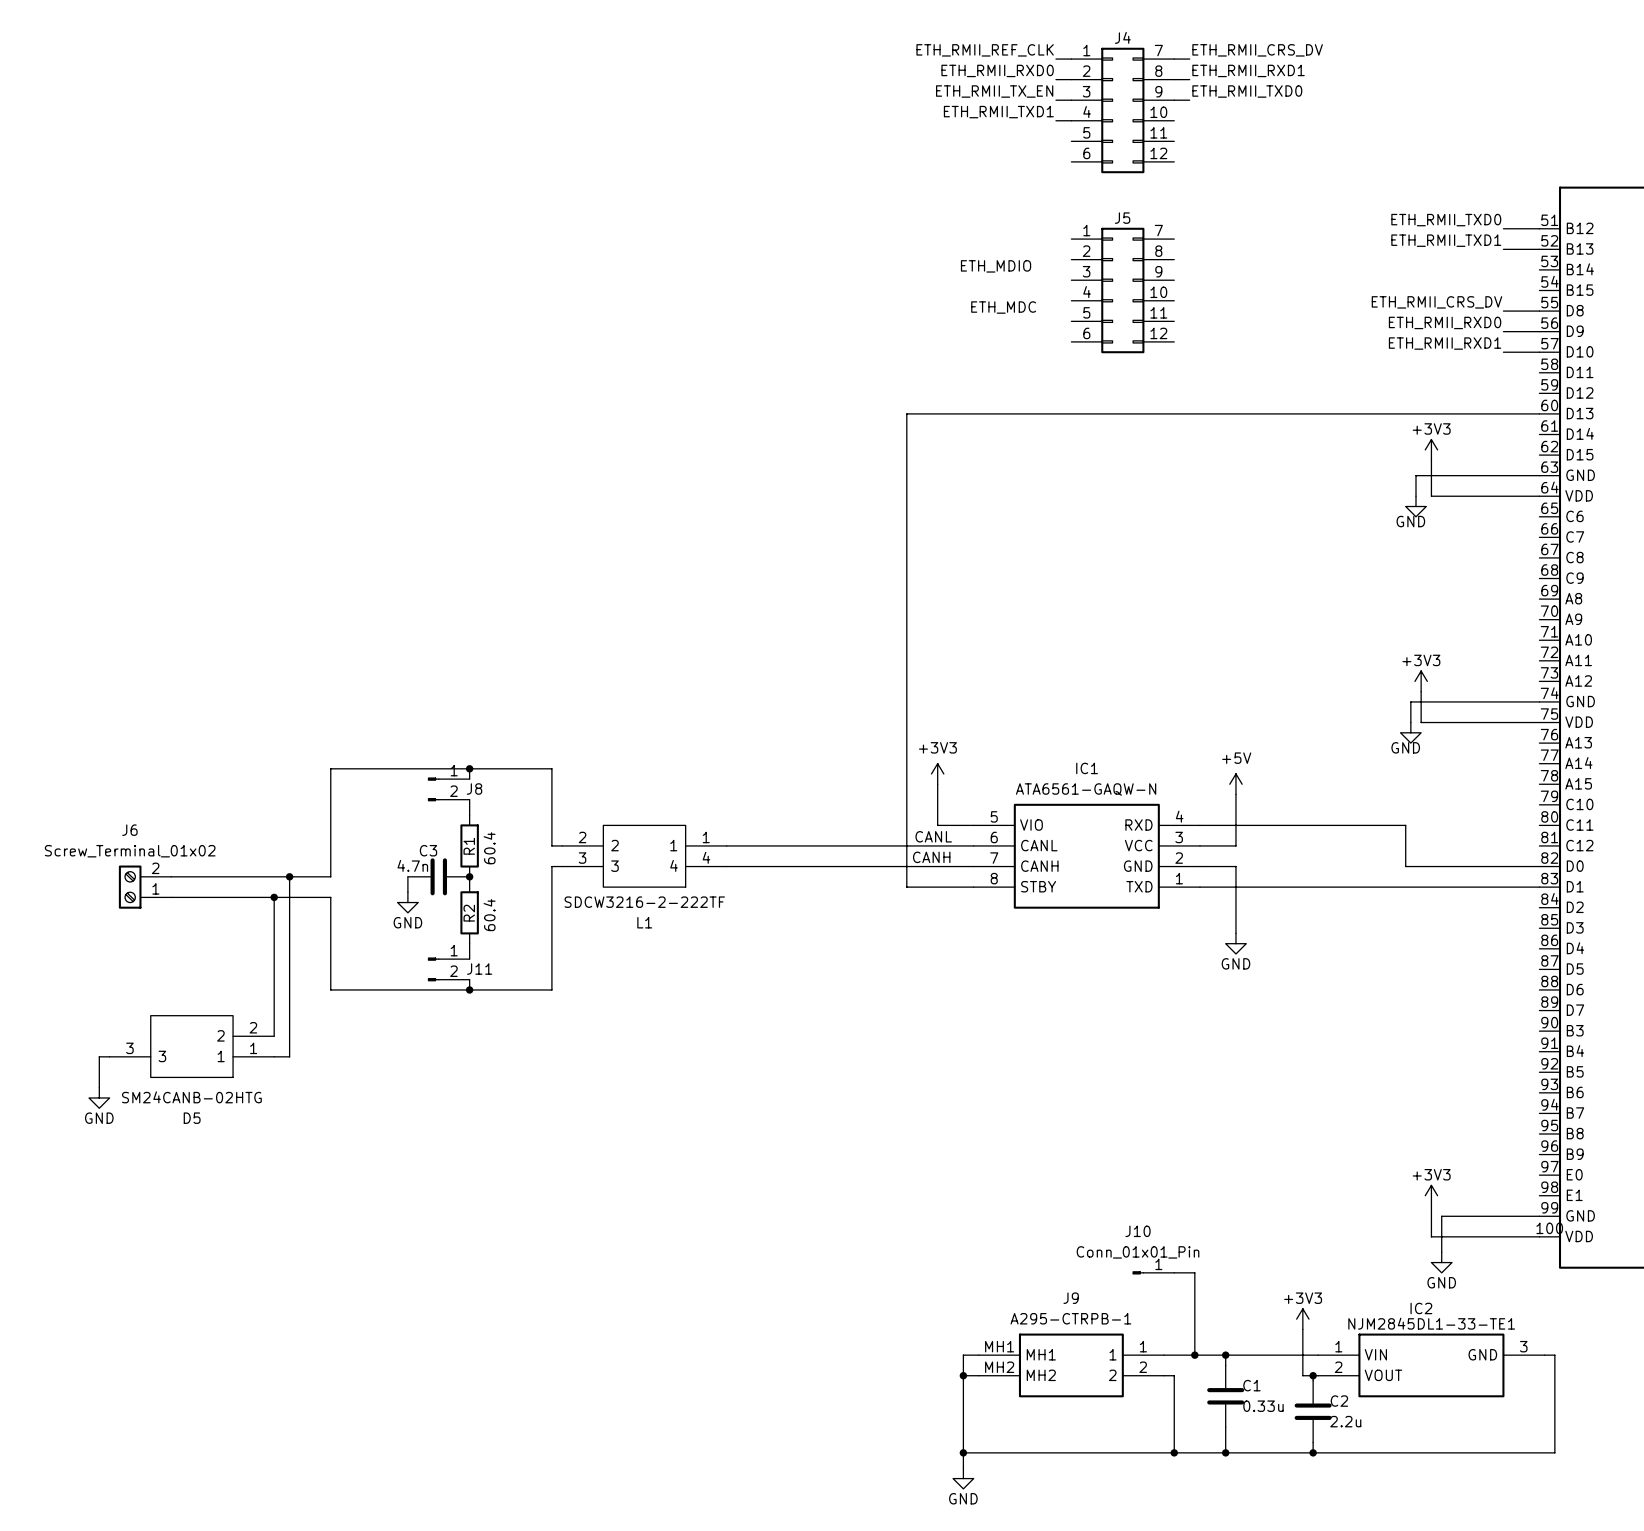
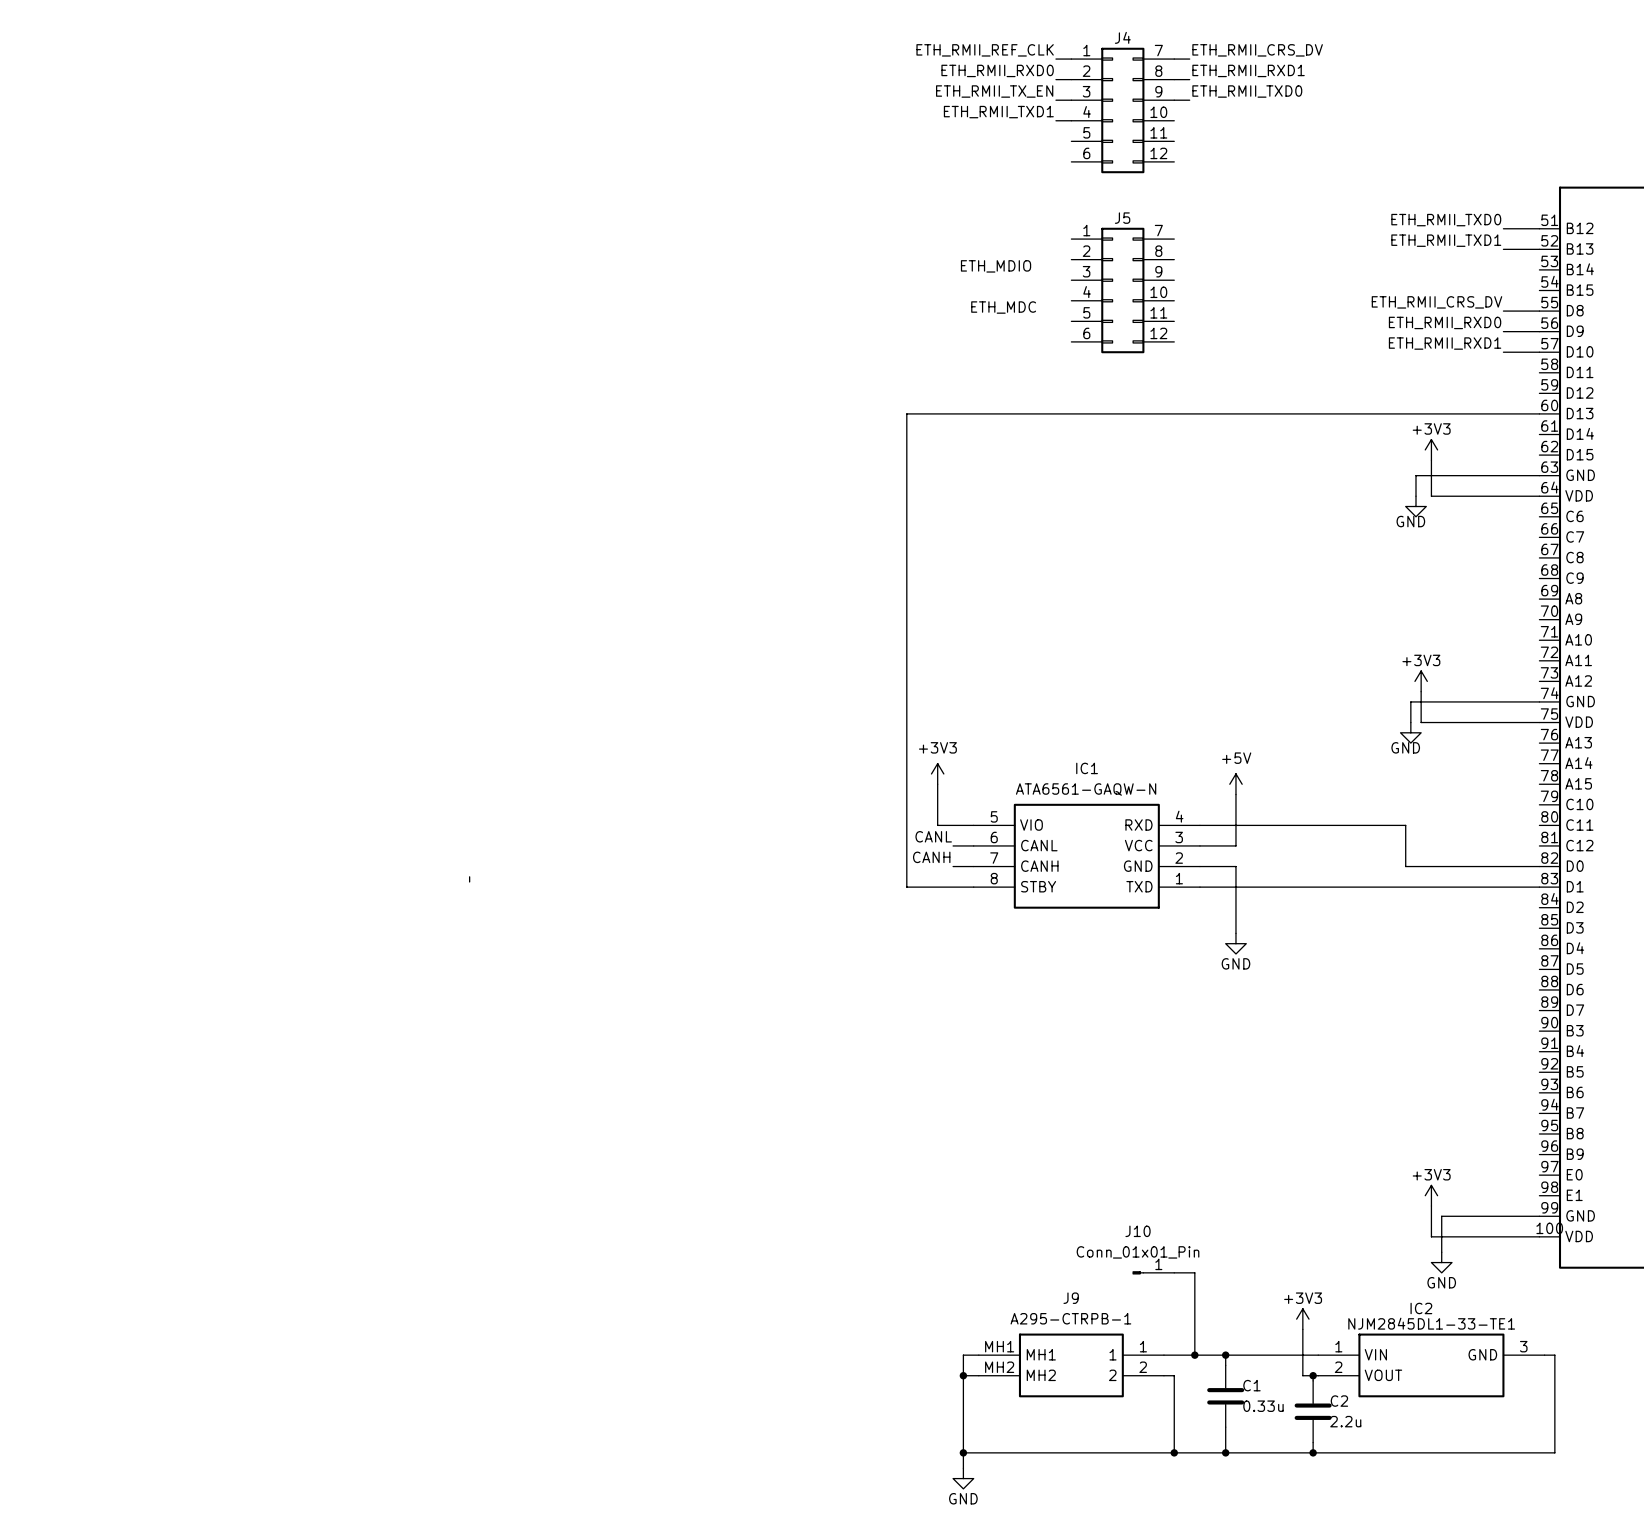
wire: (469, 768) (469, 779) -> none
junction: (469, 768) -> none
J8: (448, 789) -> none
wire: (469, 799) (469, 815) -> none
R1: 60.4 (469, 845) -> none
wire: (562, 845) (551, 845) (551, 768) (330, 768) (330, 876) (171, 876) -> none
wire: (726, 845) (953, 845) -> none
L1: SDCW3216-2-222TF (644, 856) -> none
wire: (562, 866) (551, 866) (551, 989) (330, 989) (330, 897) (171, 897) -> none
wire: (726, 866) (953, 866) -> none
wire: (289, 876) (289, 1056) (274, 1056) -> none
junction: (289, 876) -> none
wire: (407, 876) (407, 892) -> none
C3: 4.7n (438, 876) -> none
junction: (469, 876) -> none
J6: Screw_Terminal_01x02 (145, 887) -> none
wire: (274, 897) (274, 1036) -> none
junction: (274, 897) -> none
power symbol: GND (407, 902) -> none
R2: 60.4 (469, 912) -> none
wire: (469, 943) (469, 959) -> none
J11: (448, 969) -> none
wire: (469, 979) (469, 989) -> none
junction: (469, 989) -> none
D5: SM24CANB-02HTG (191, 1046) -> none
wire: (109, 1056) (99, 1056) (99, 1087) -> none
power symbol: GND (99, 1097) -> none

